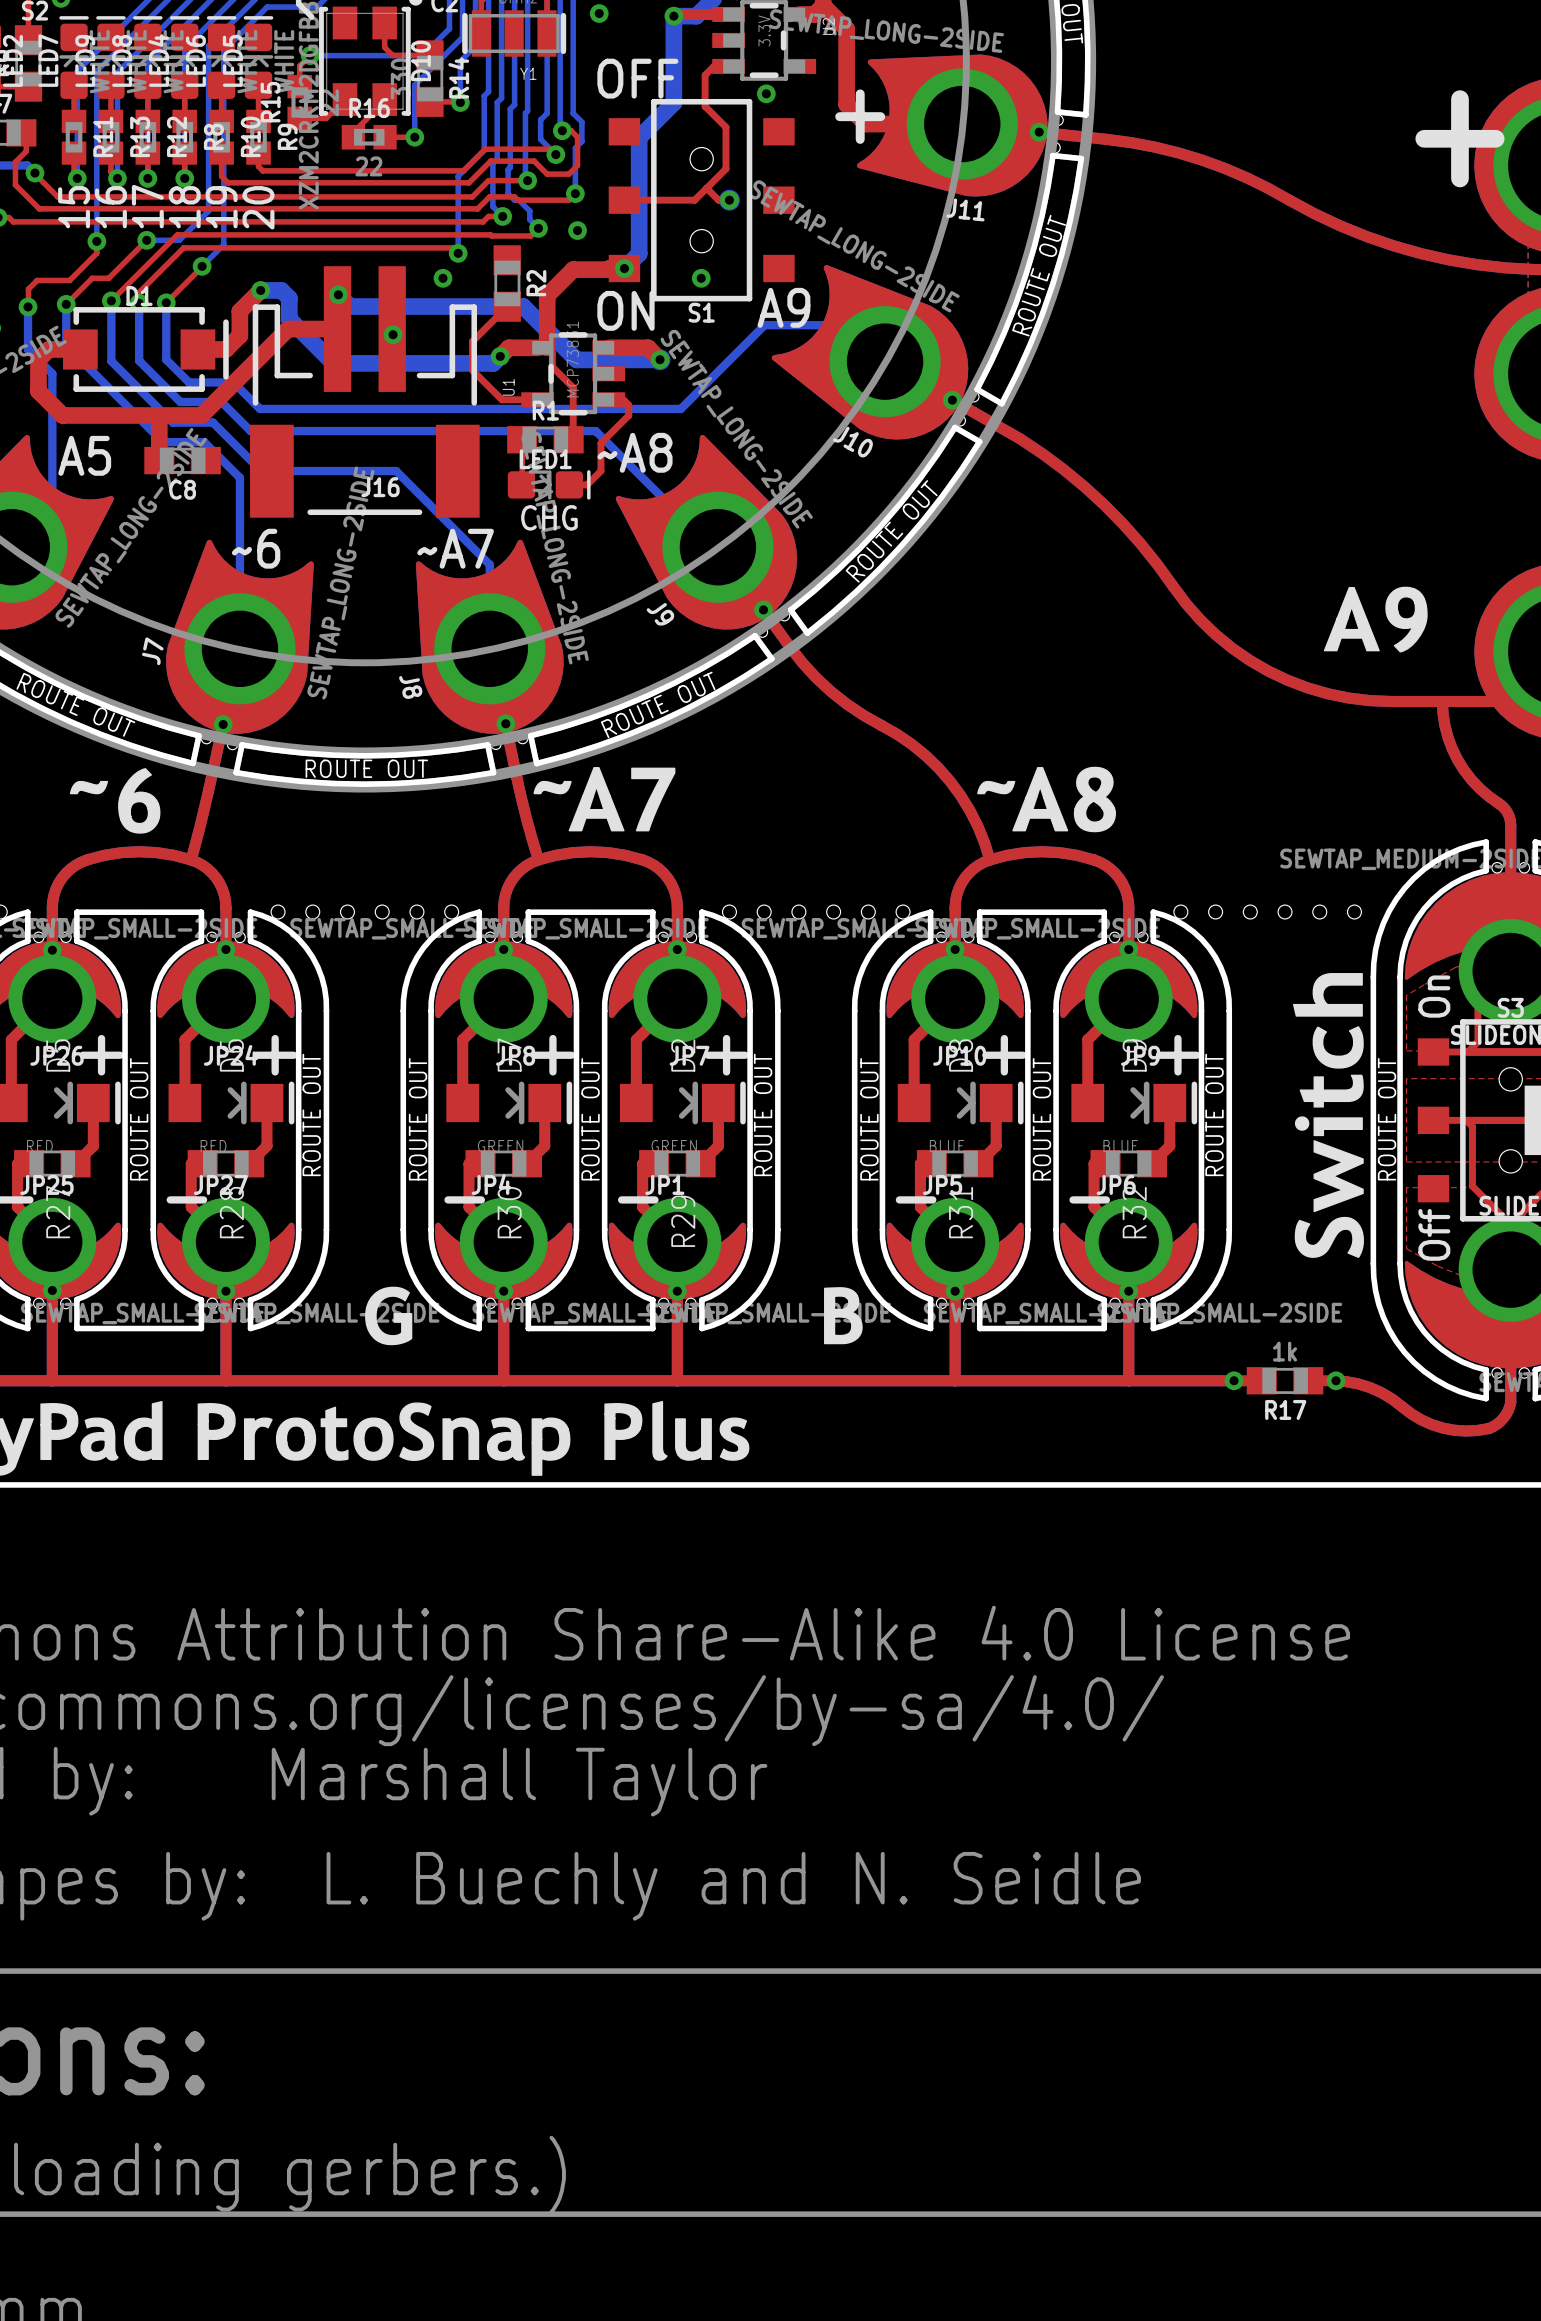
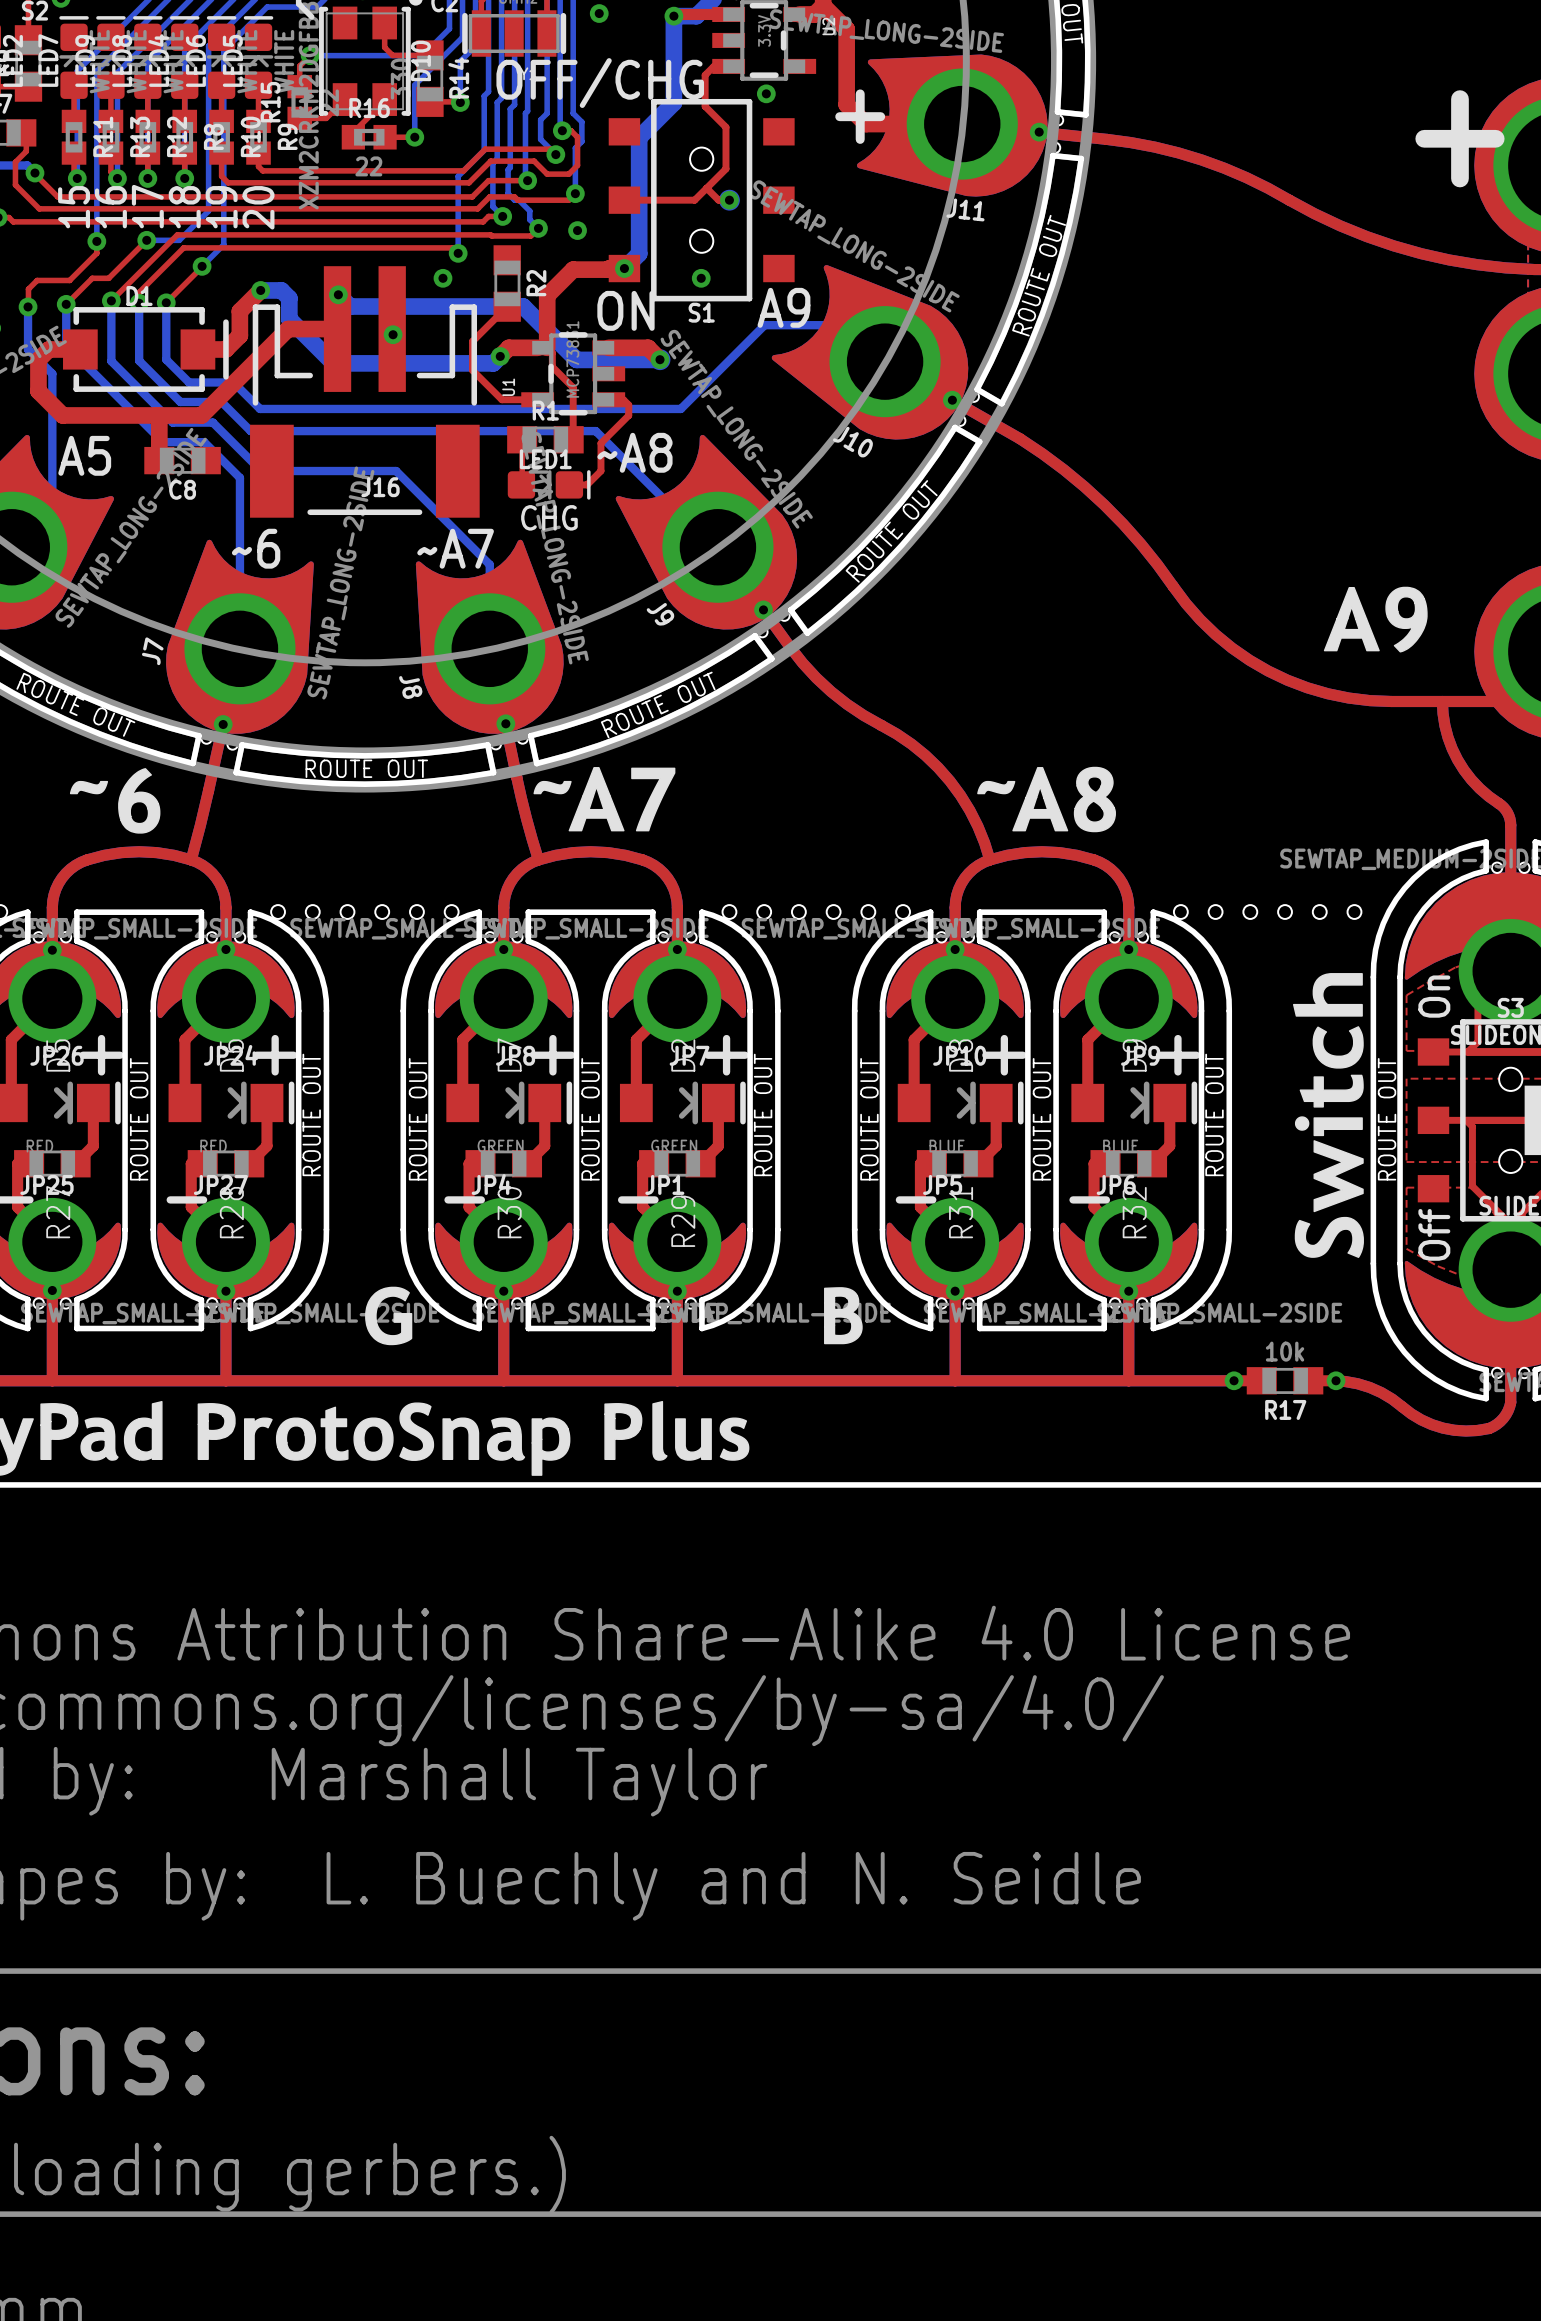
text: OFF (637, 78) -> none
text: none -> OFF/CHG (600, 83)
R17 value: 1k (1285, 1351) -> 10k (1285, 1351)

